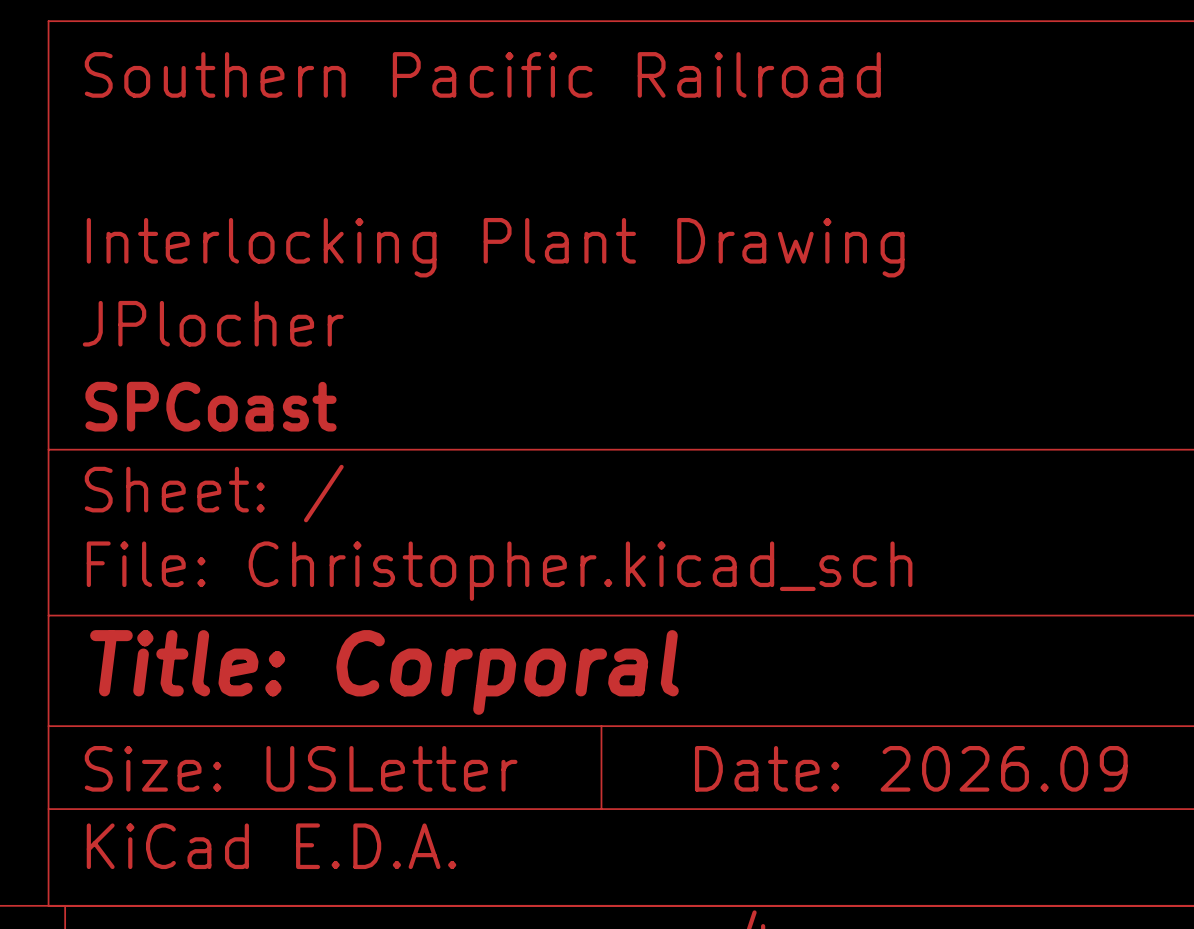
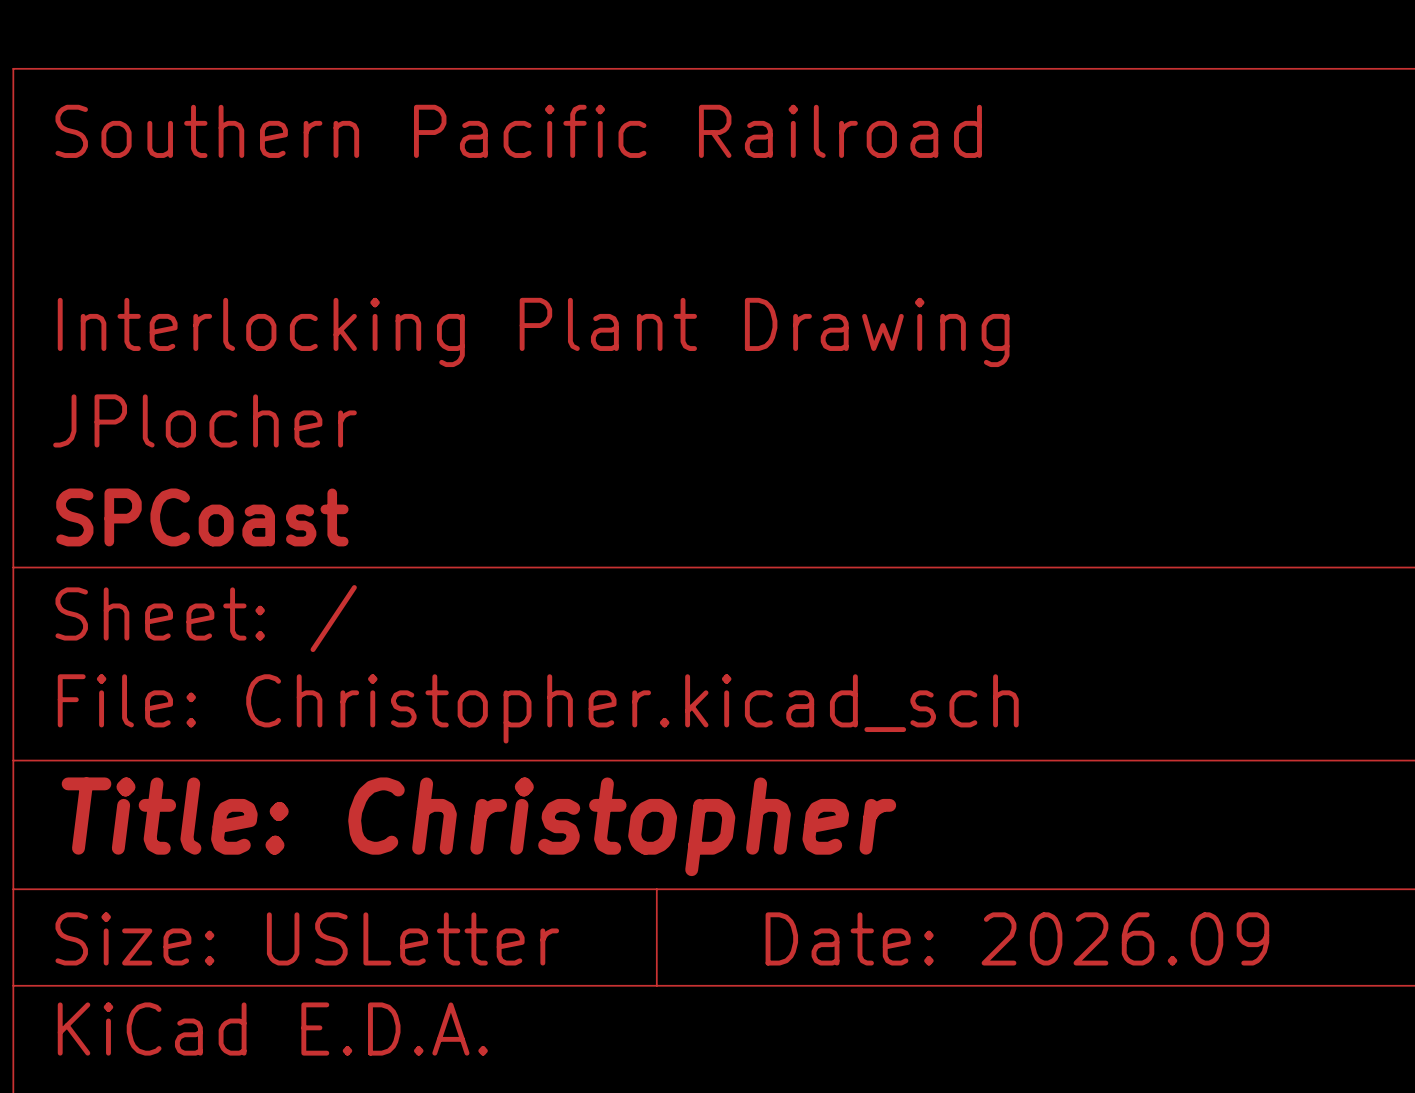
title block: Title: Corporal (384, 672) -> Title: Christopher (478, 826)

